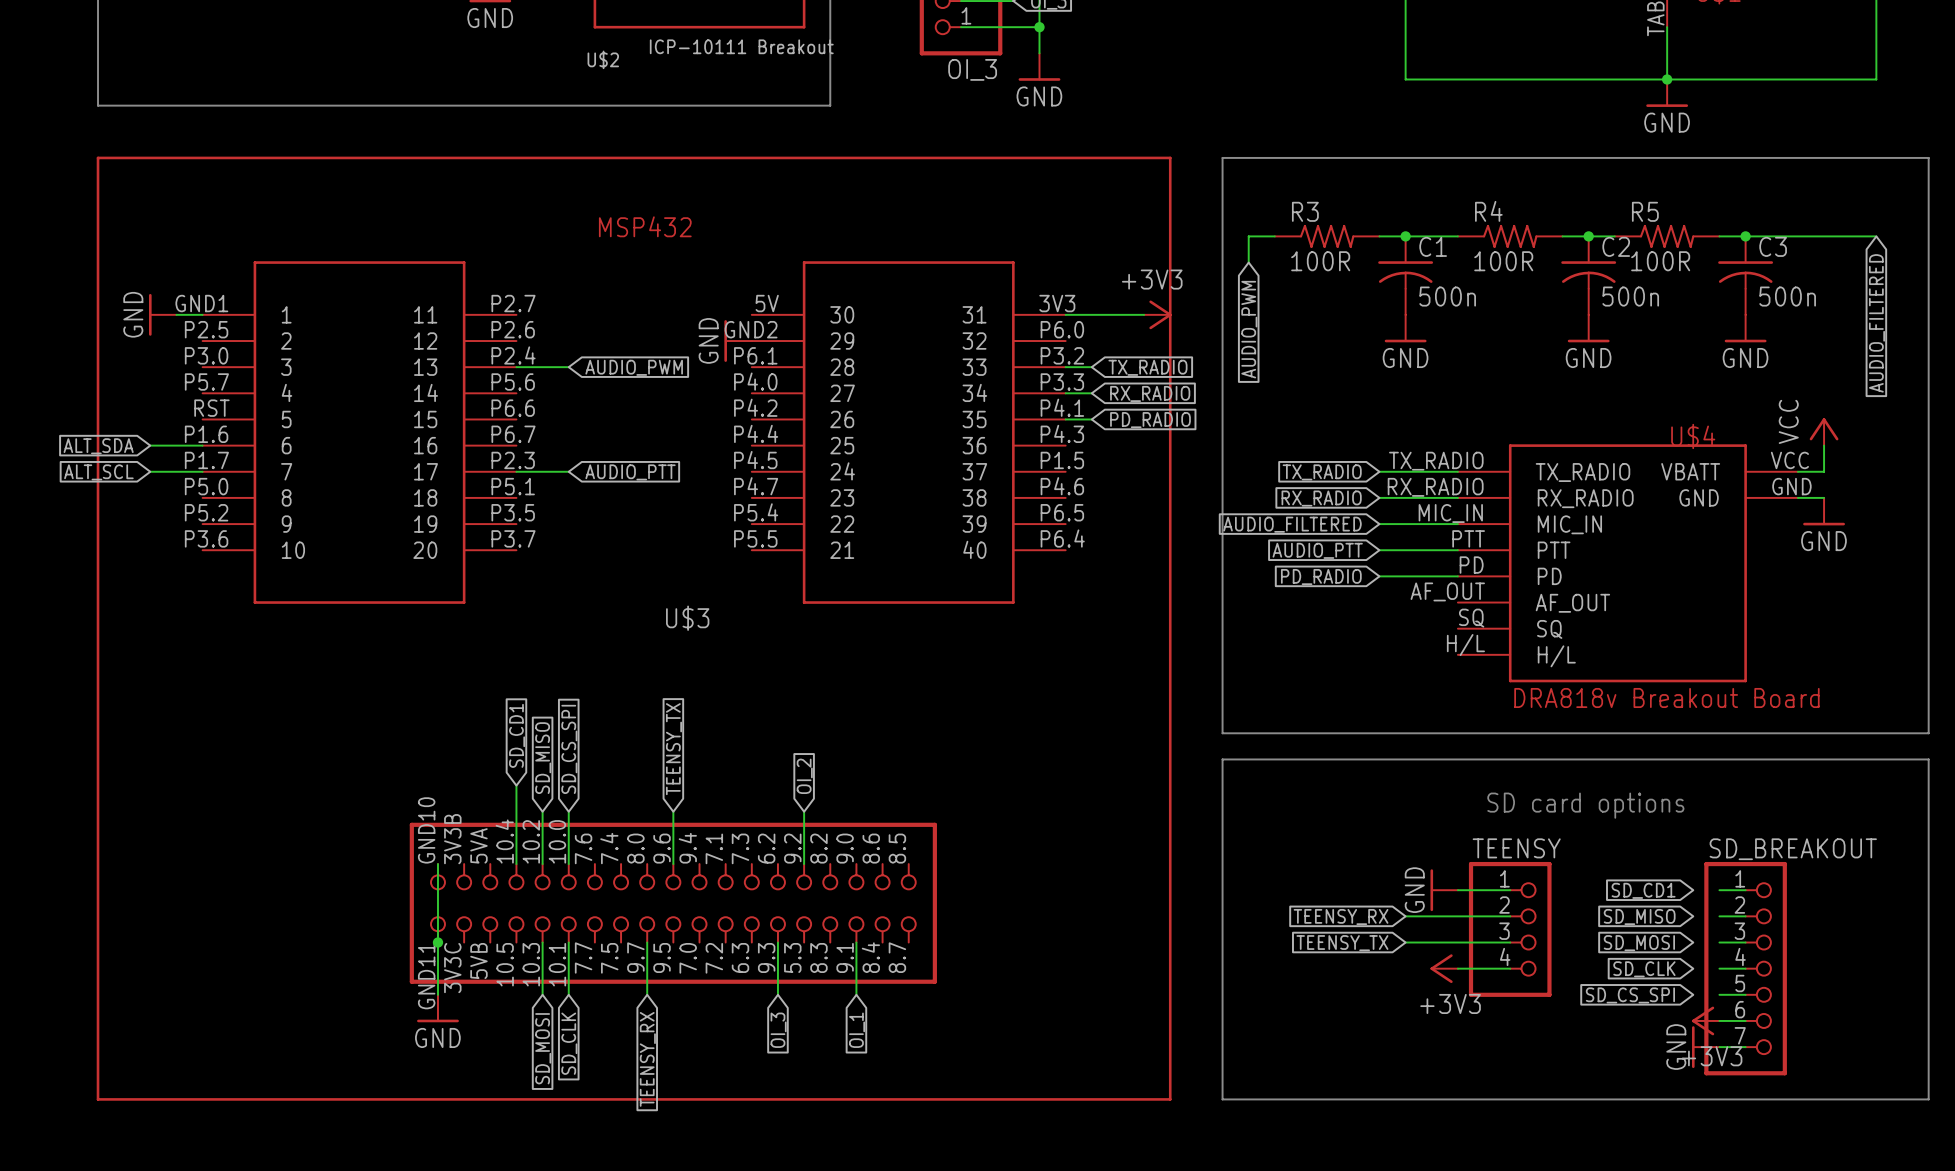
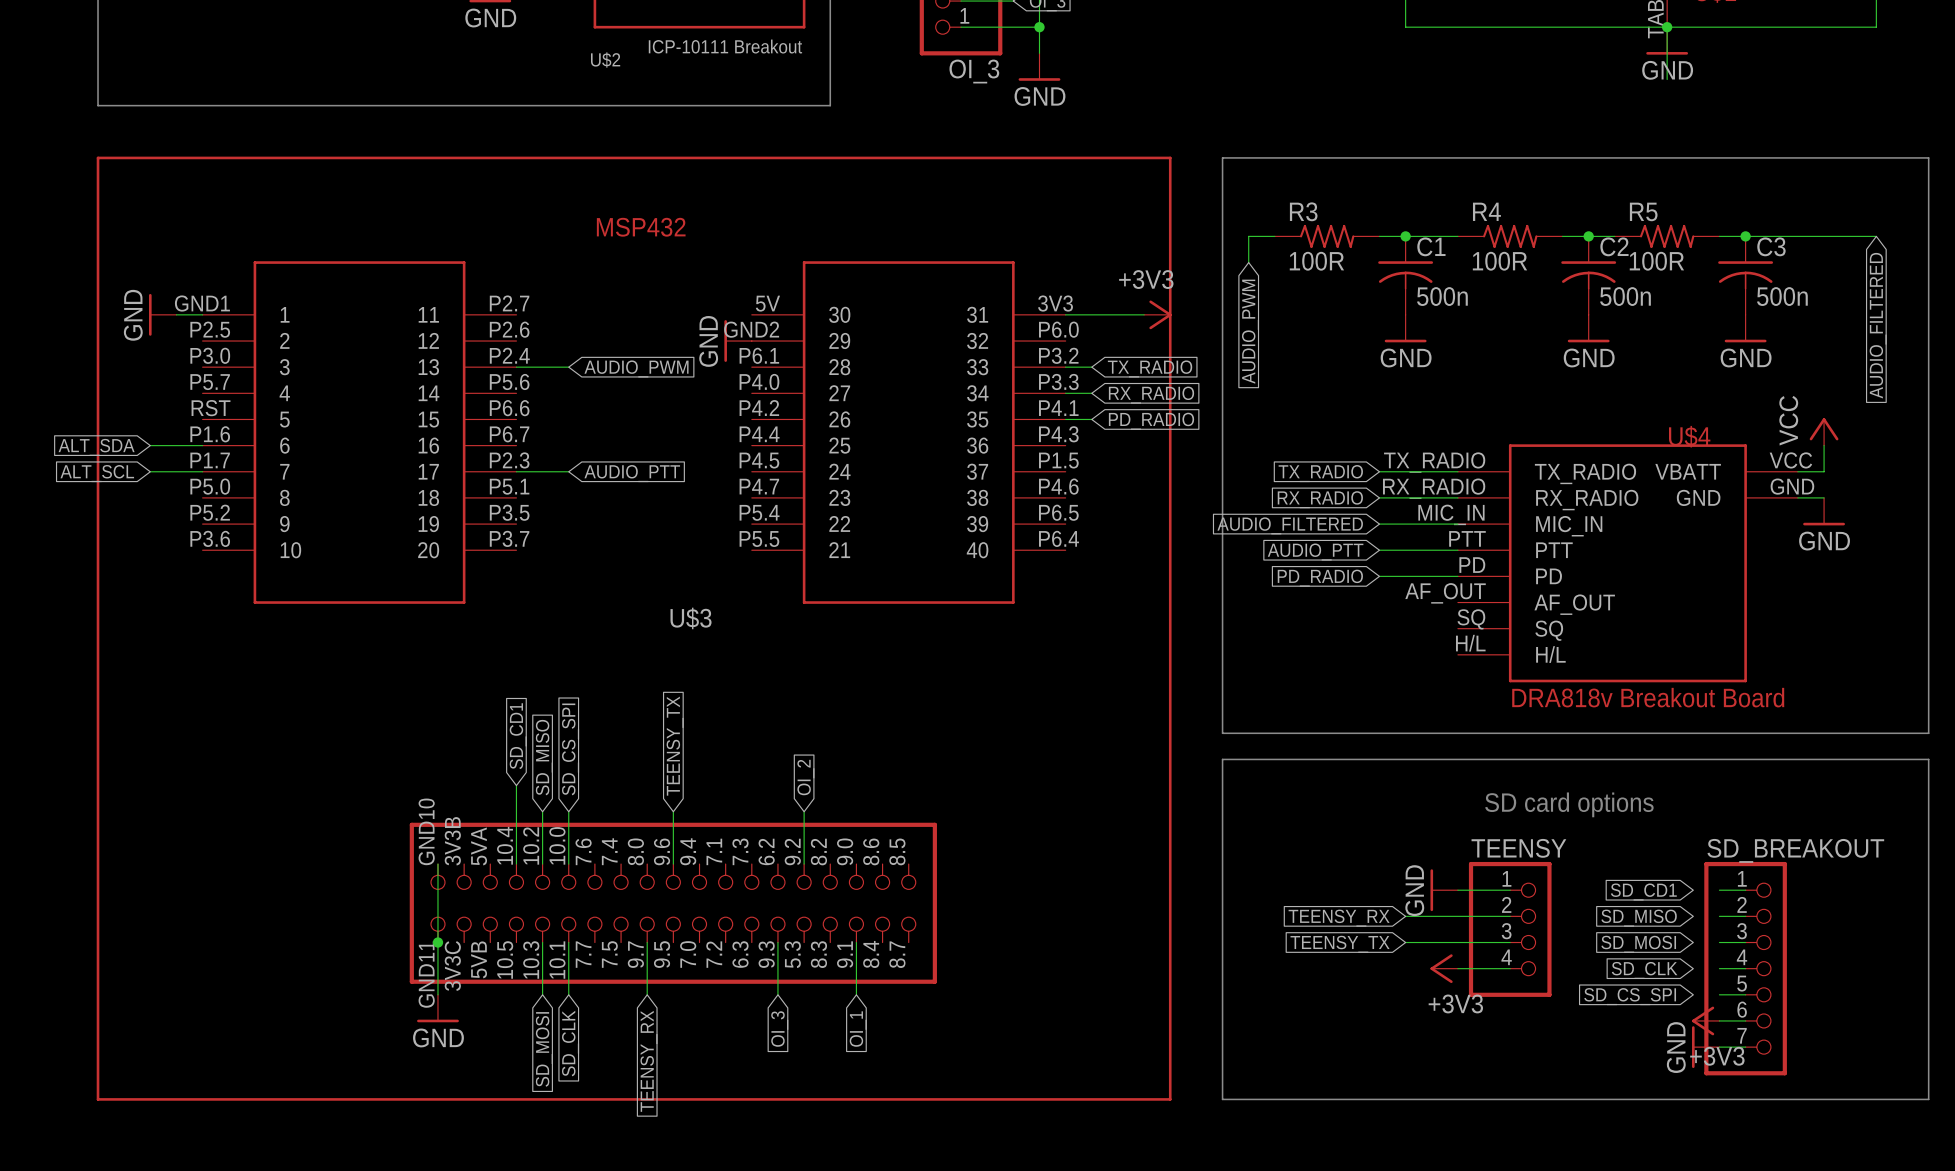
wire: (1405, 27) (1405, 79) (1876, 79) (1876, 27) -> (1405, 27) (1876, 27)
junction position: (1667, 79) -> (1667, 27)
power symbol position: GND (1667, 93) -> GND (1667, 40)

